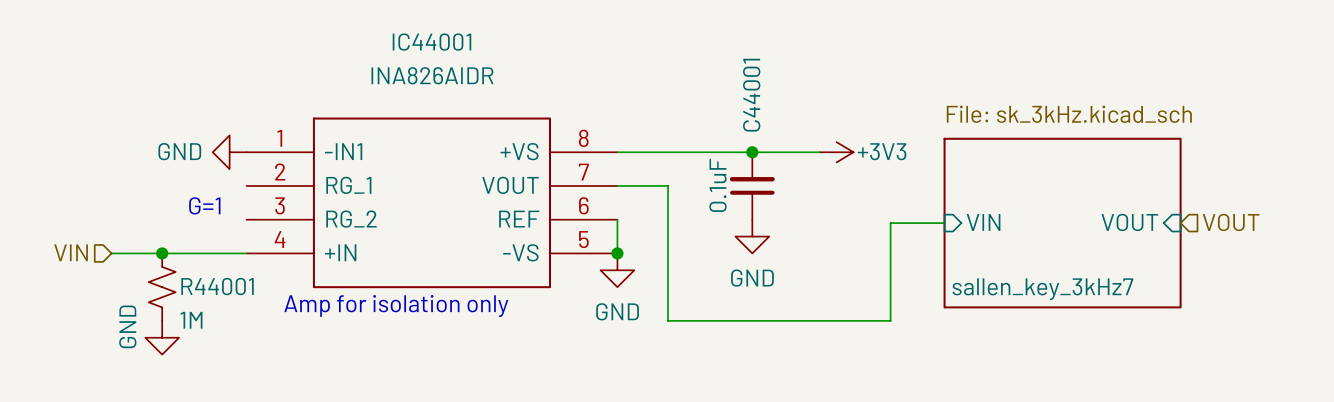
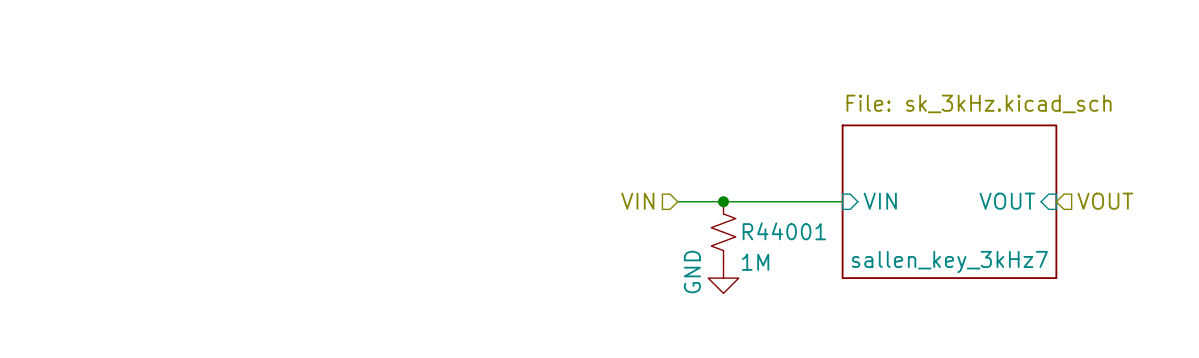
power symbol: GND (229, 152) -> none
wire: (617, 152) (819, 152) -> none
junction: (752, 152) -> none
power symbol: +3V3 (836, 152) -> none
wire: (617, 185) (668, 185) (668, 320) (890, 320) (890, 223) -> (677, 201) (793, 201)
C44001: 0.1uF (752, 185) -> none
IC44001: INA826AIDR (431, 202) -> none
text: G=1 (204, 205) -> none
wire: (617, 219) (617, 253) -> none
hierarchical label: none -> VIN (637, 201)
junction: none -> (723, 201)
power symbol position: GND (752, 236) -> GND (723, 278)
hierarchical label: VIN (71, 252) -> none
wire: (111, 253) (246, 253) -> none
junction: (162, 253) -> none
junction: (617, 253) -> none
power symbol: GND (617, 270) -> none
power symbol text rotation: 0° (752, 278) -> 90° counterclockwise (692, 272)
R44001 position: (162, 287) -> (723, 232)
text: Amp for isolation only (396, 305) -> none
power symbol: GND (162, 337) -> none

